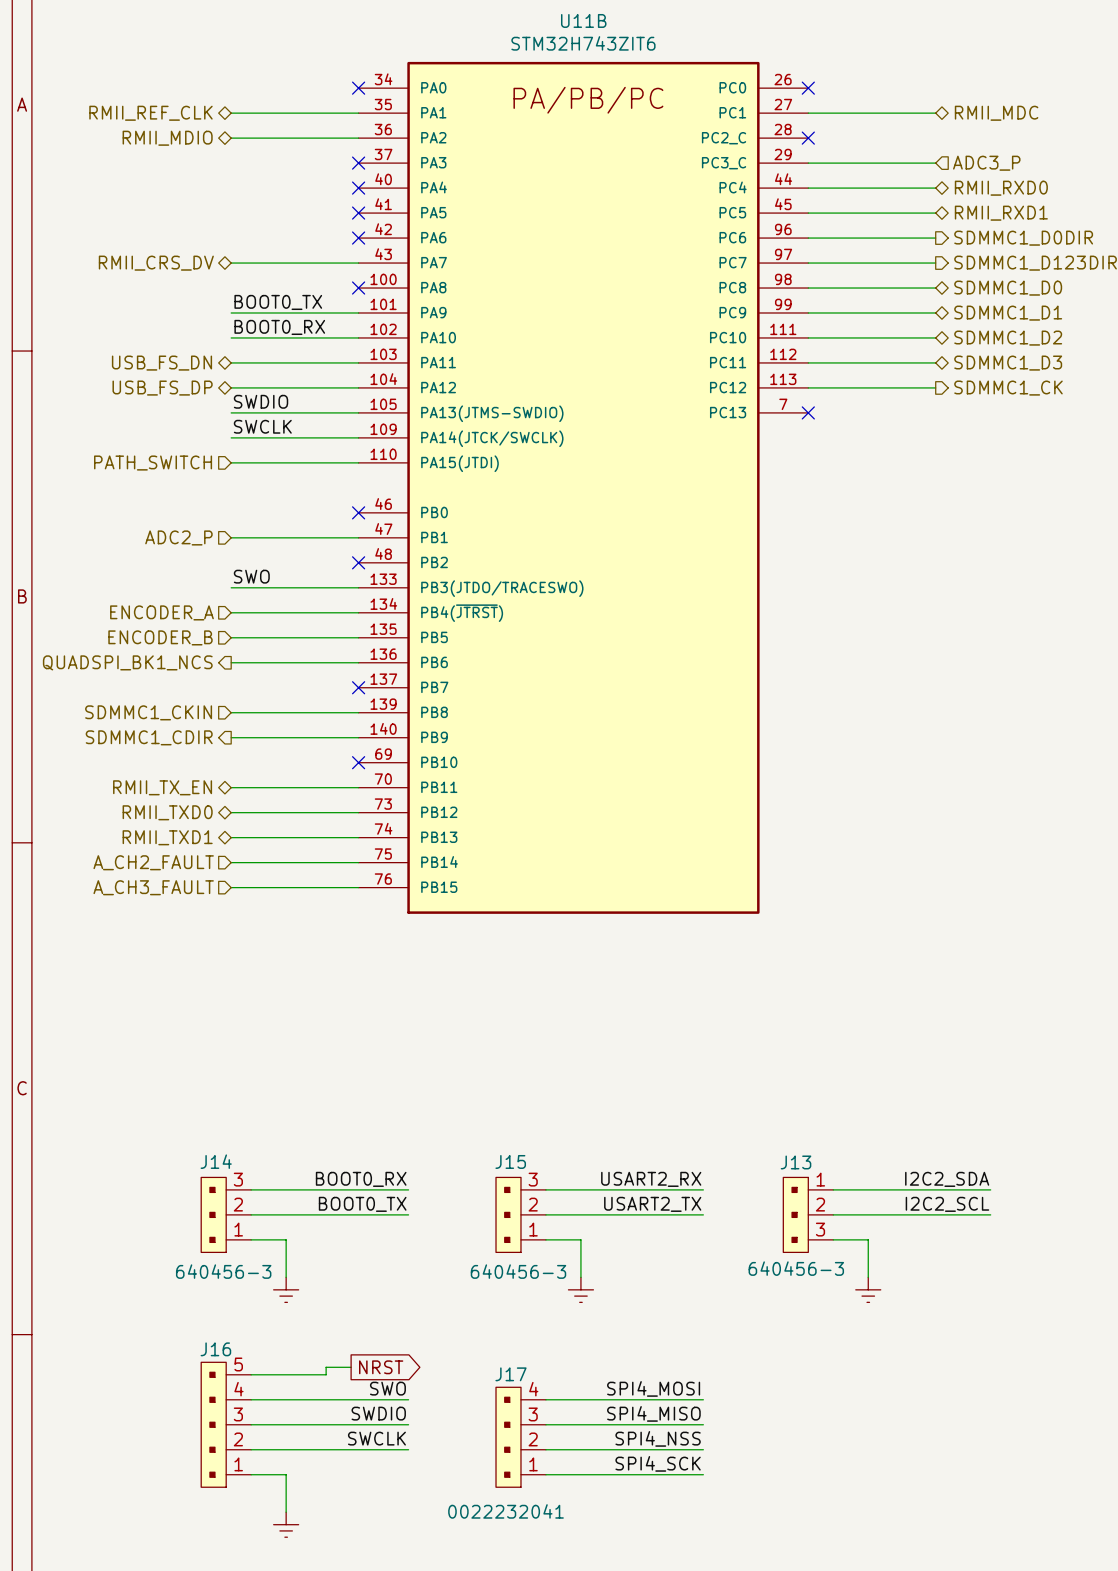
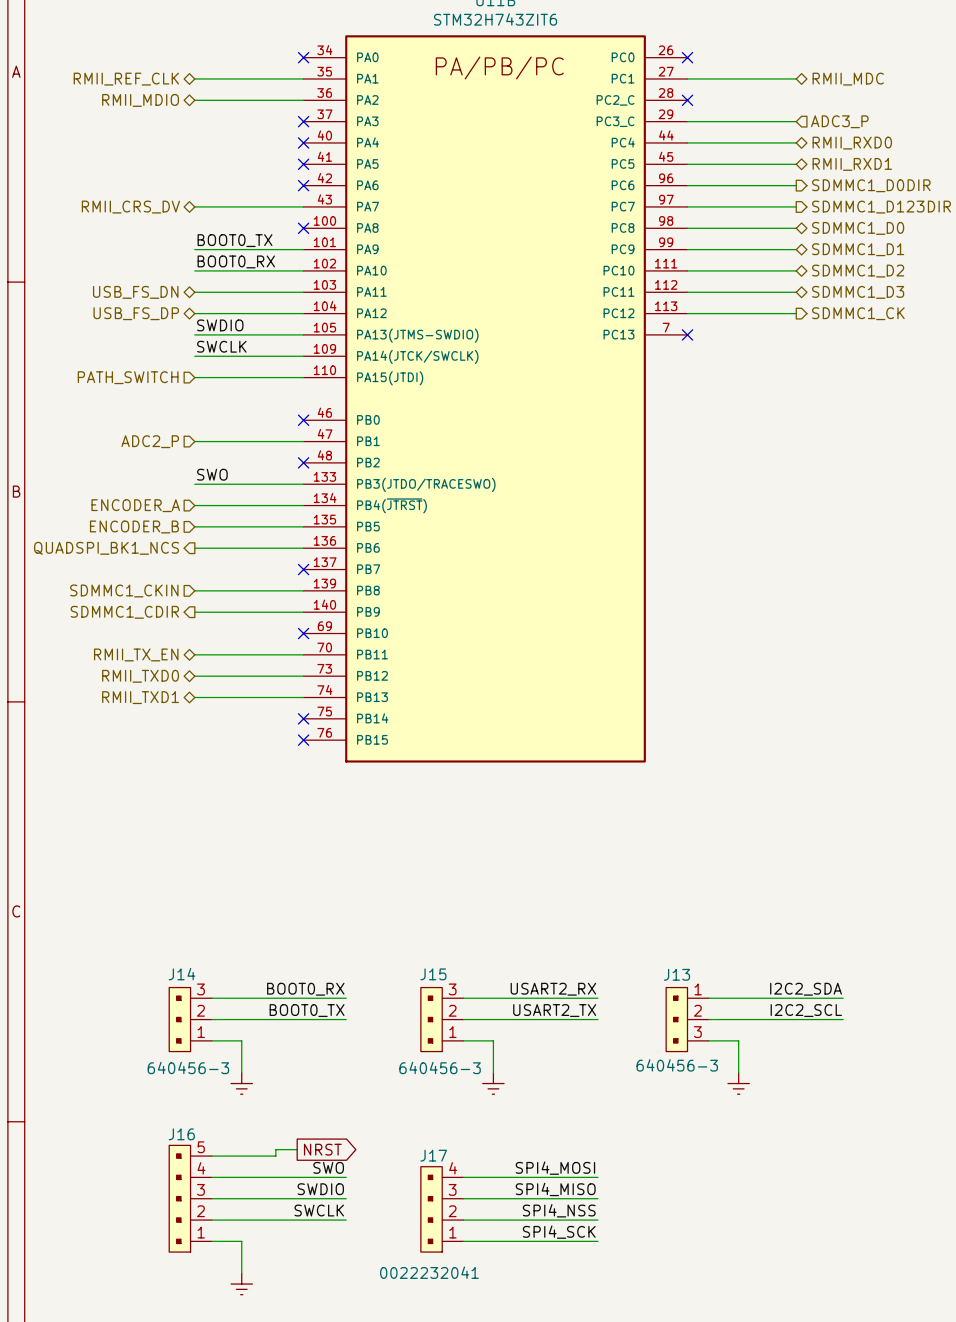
hierarchical label: A_CH2_FAULT (153, 862) -> none
wire: (231, 862) (358, 862) -> none
no-connect mark: none -> (303, 718)
hierarchical label: A_CH3_FAULT (153, 887) -> none
wire: (231, 887) (358, 887) -> none
no-connect mark: none -> (303, 740)

